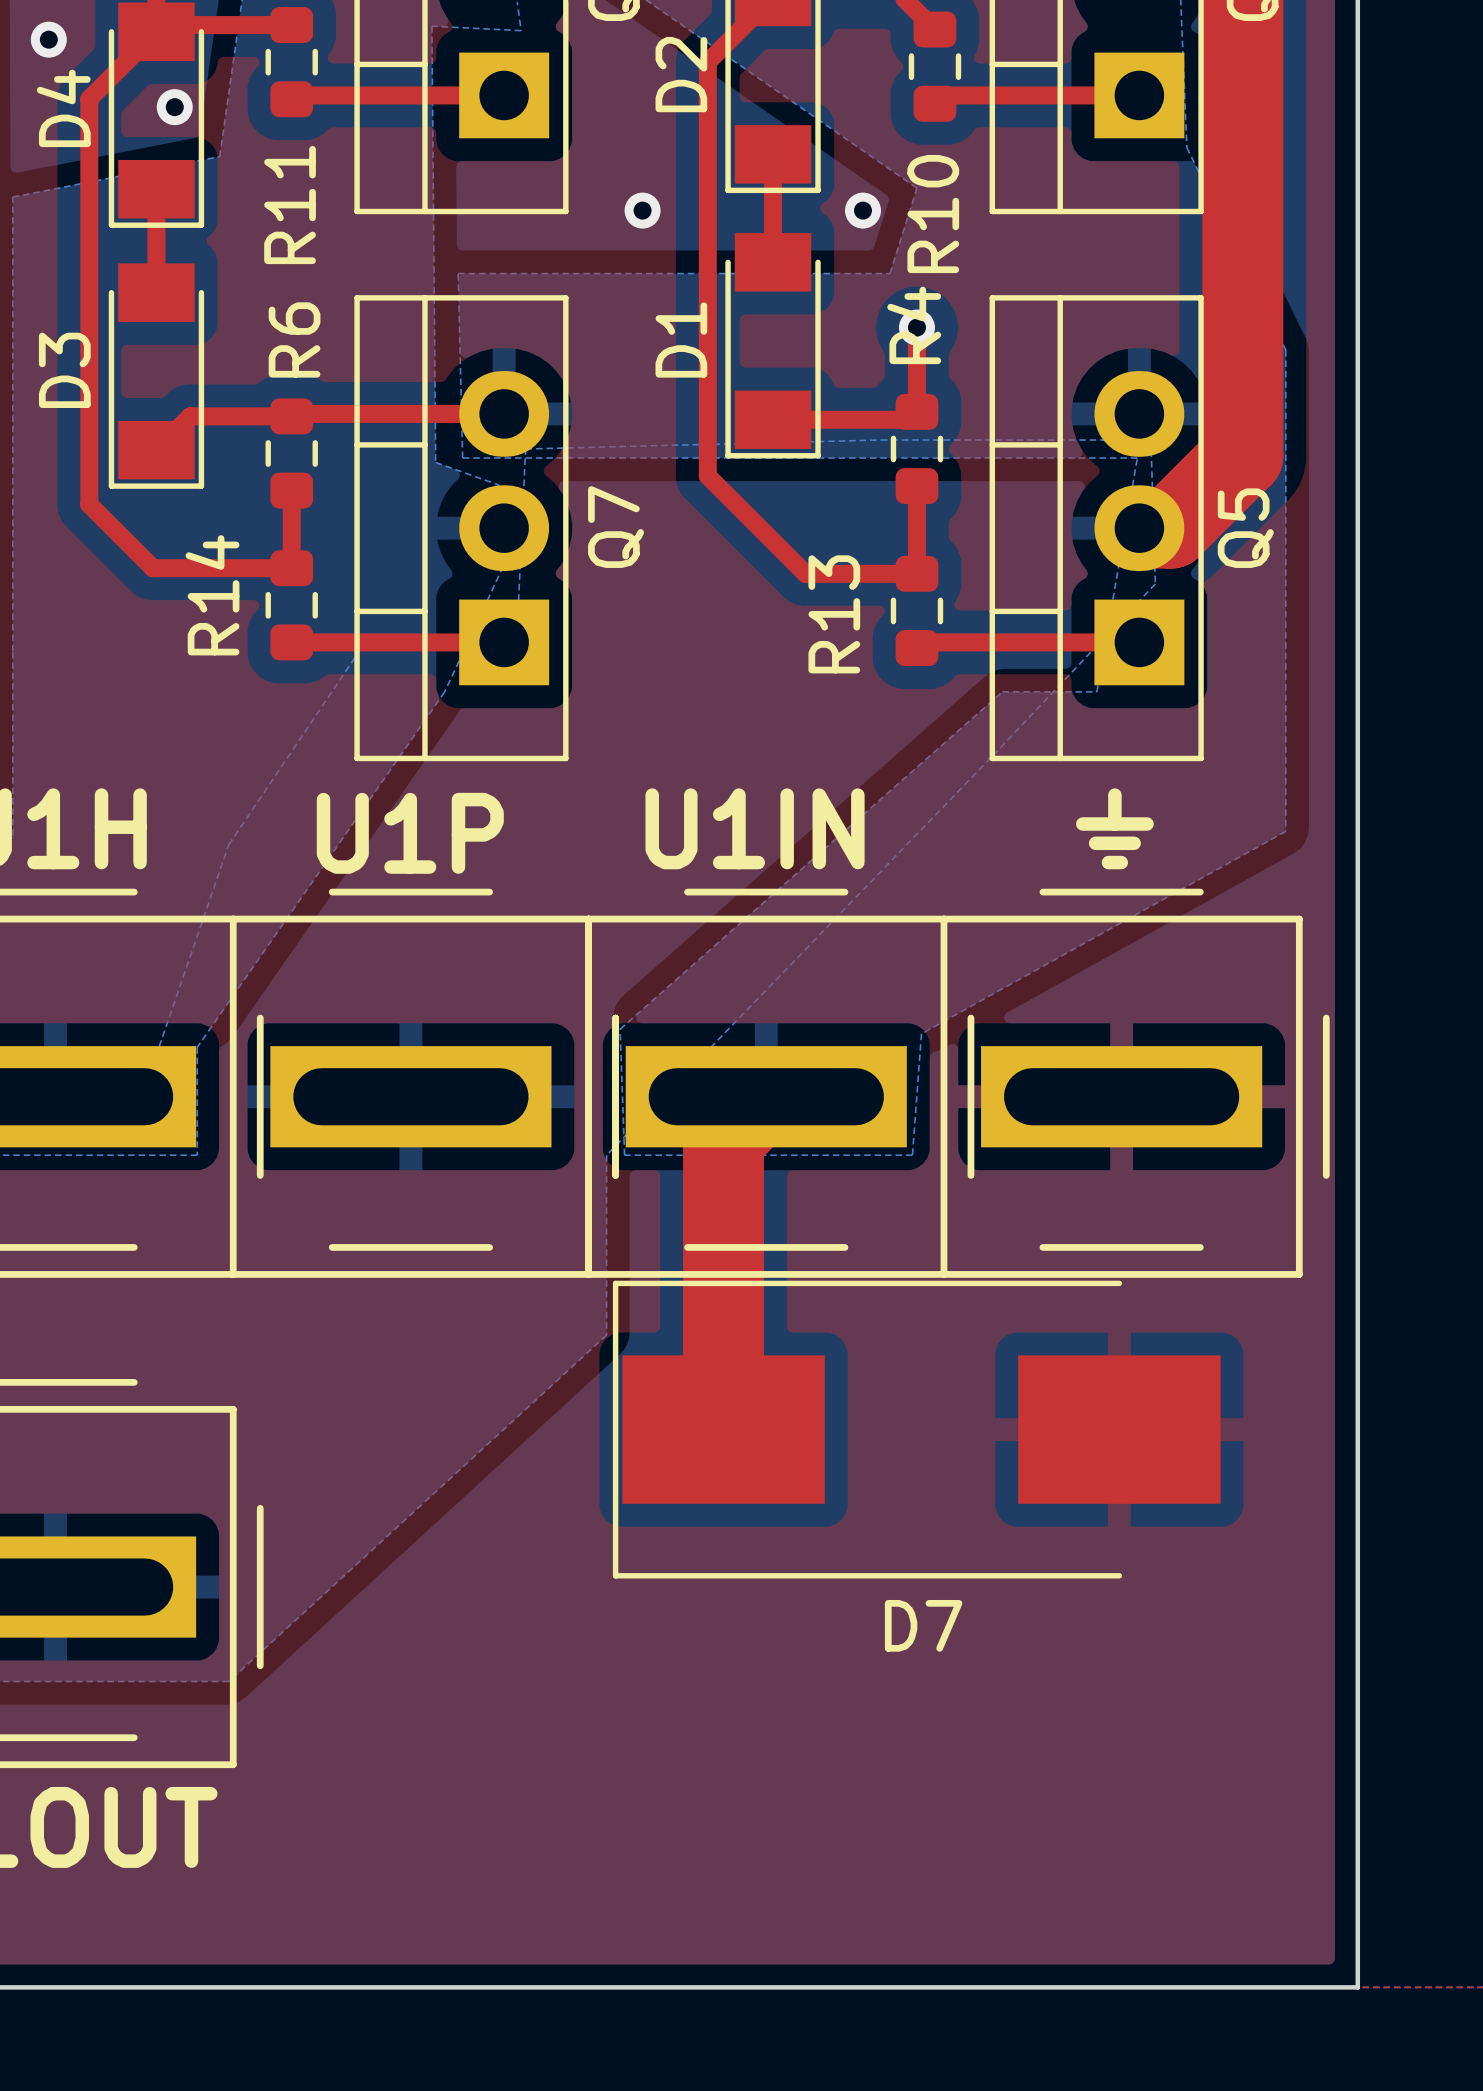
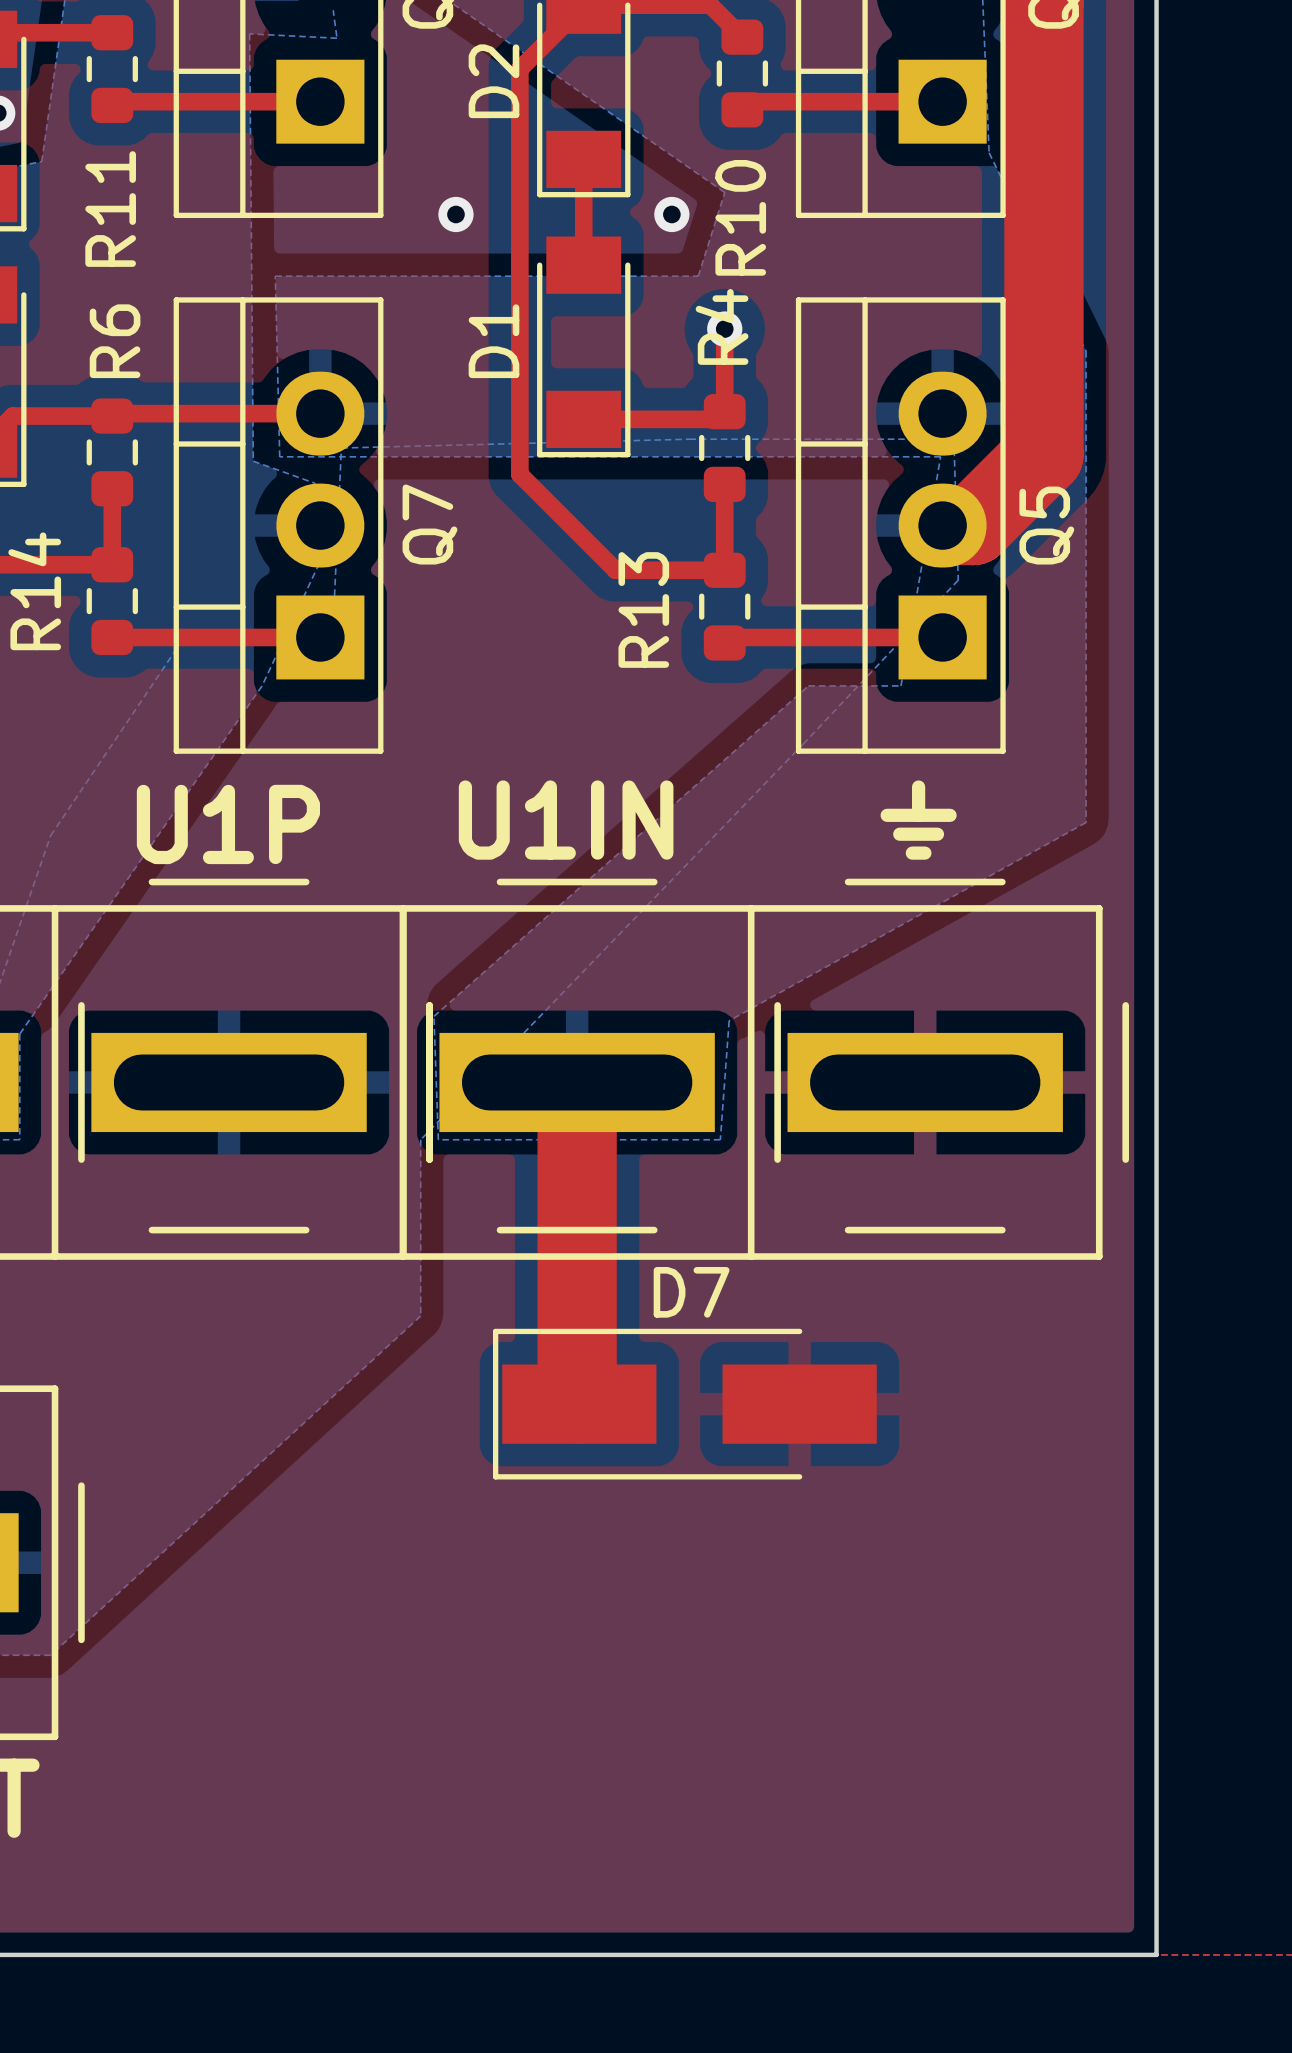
top track: (766, 1096) (723, 1139) (723, 1429) -> (577, 1082) (577, 1401) (579, 1404)
D7 footprint: [612, 1280, 1221, 1579] -> [492, 1328, 877, 1480]
D7 name position: D7 (923, 1625) -> D7 (691, 1292)

